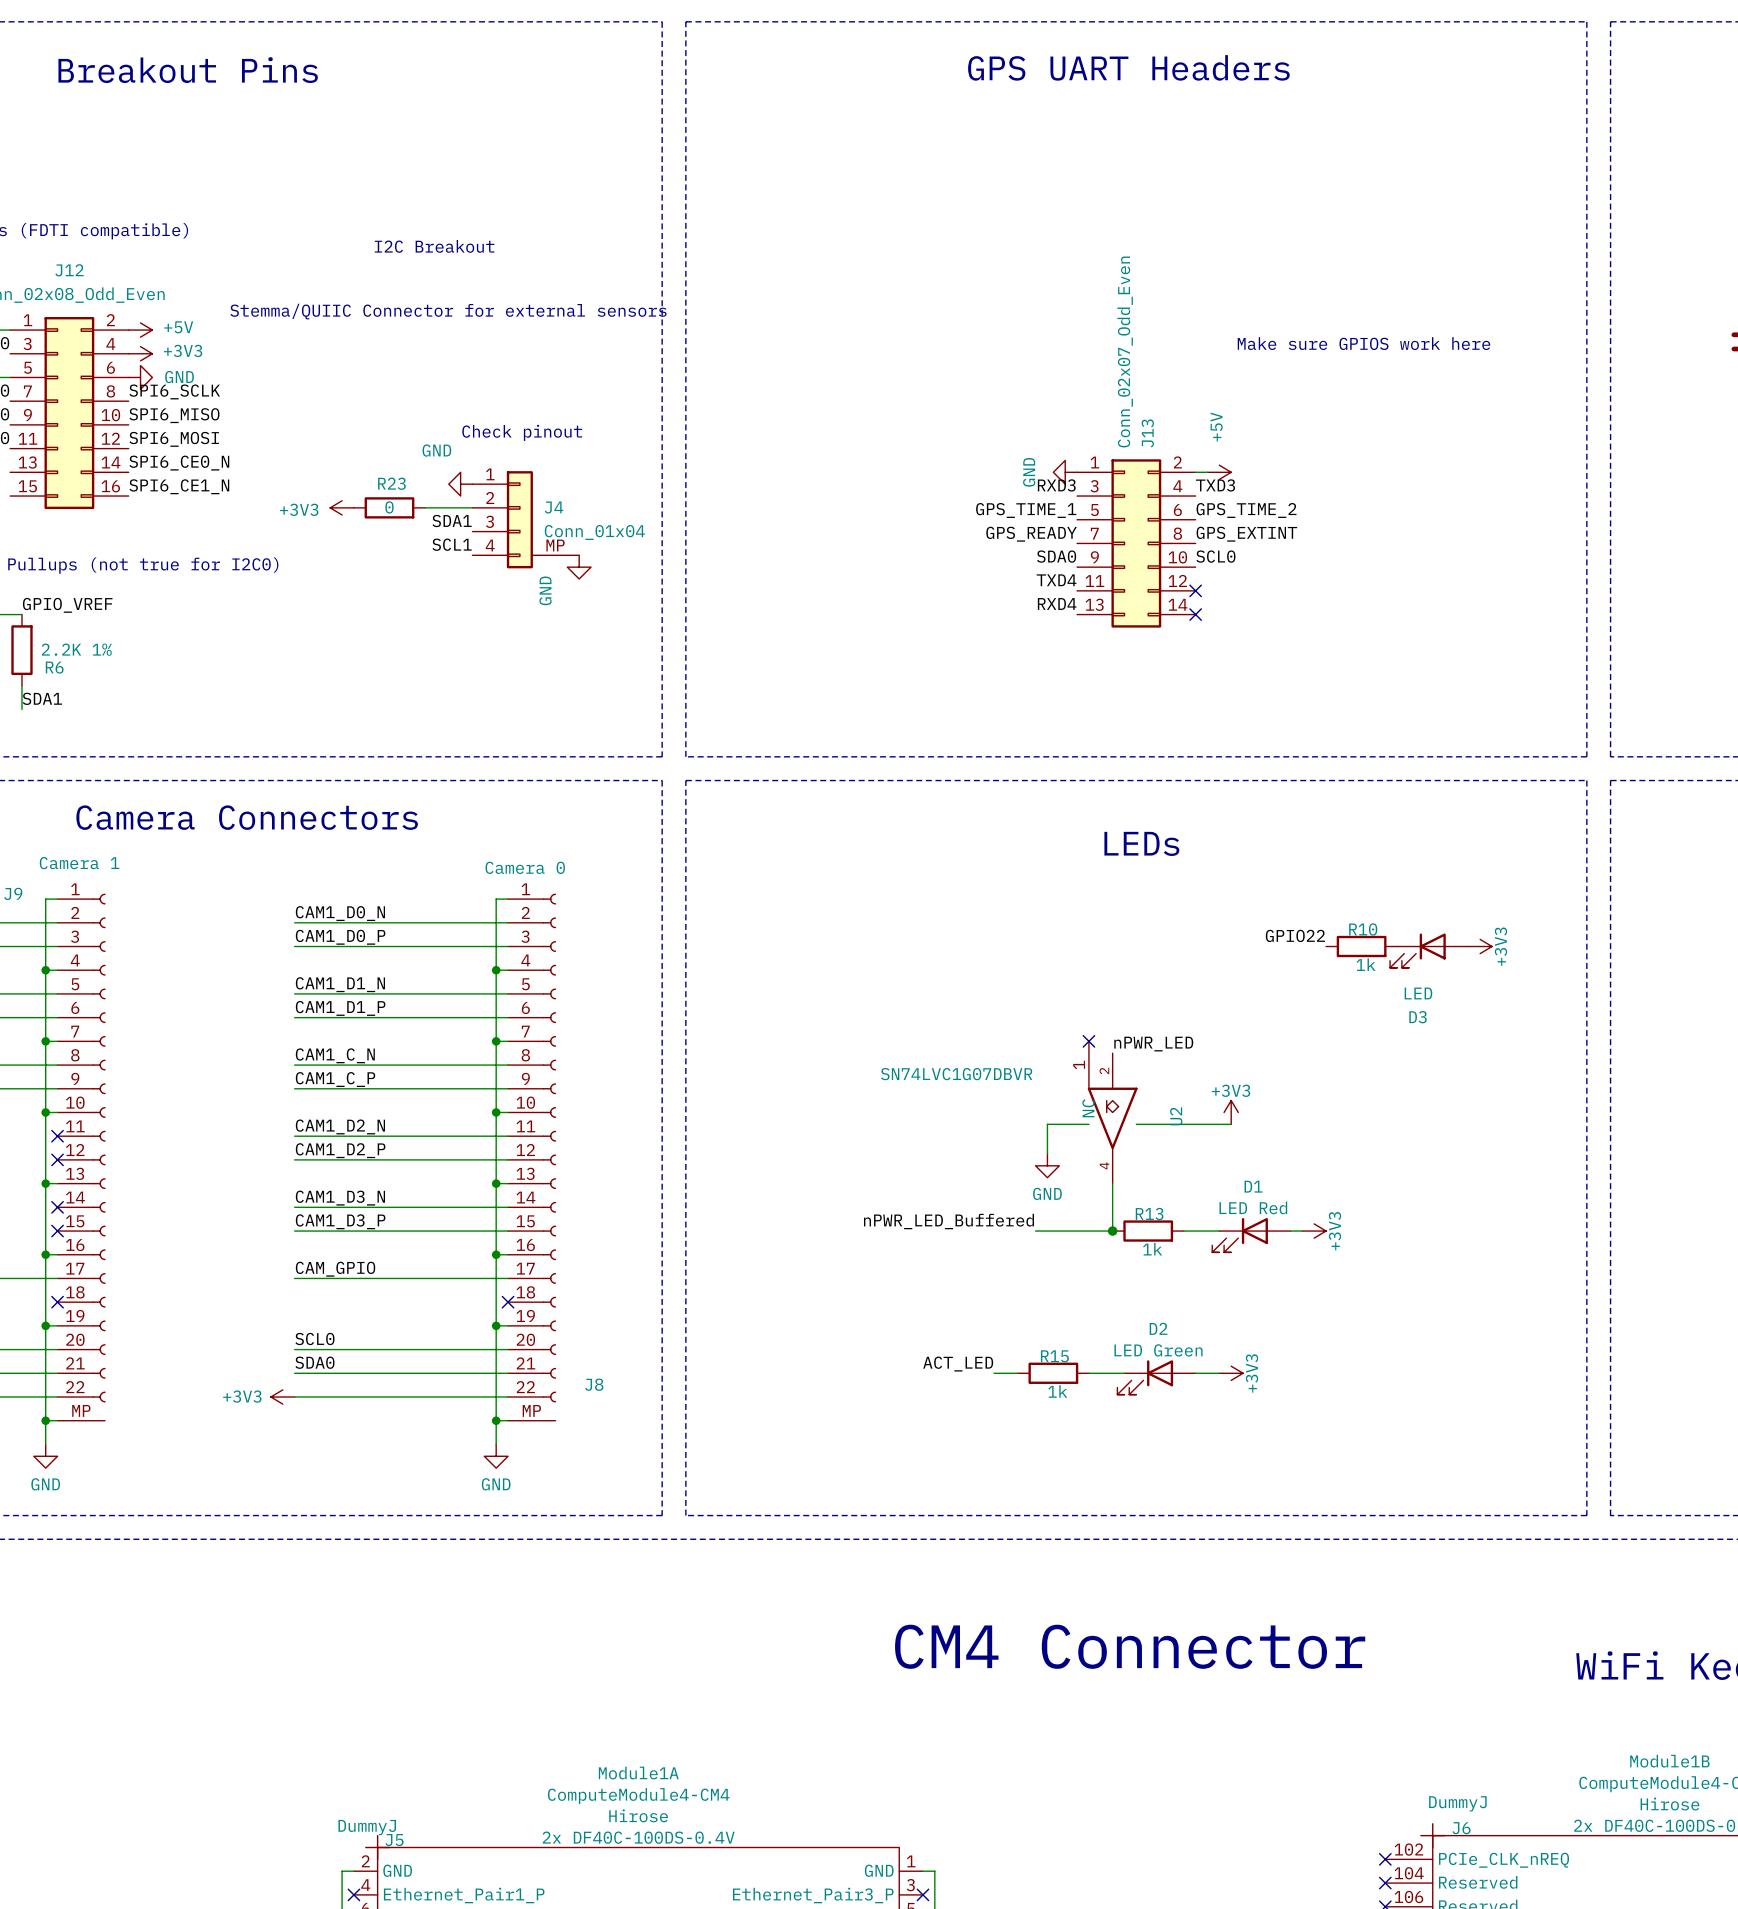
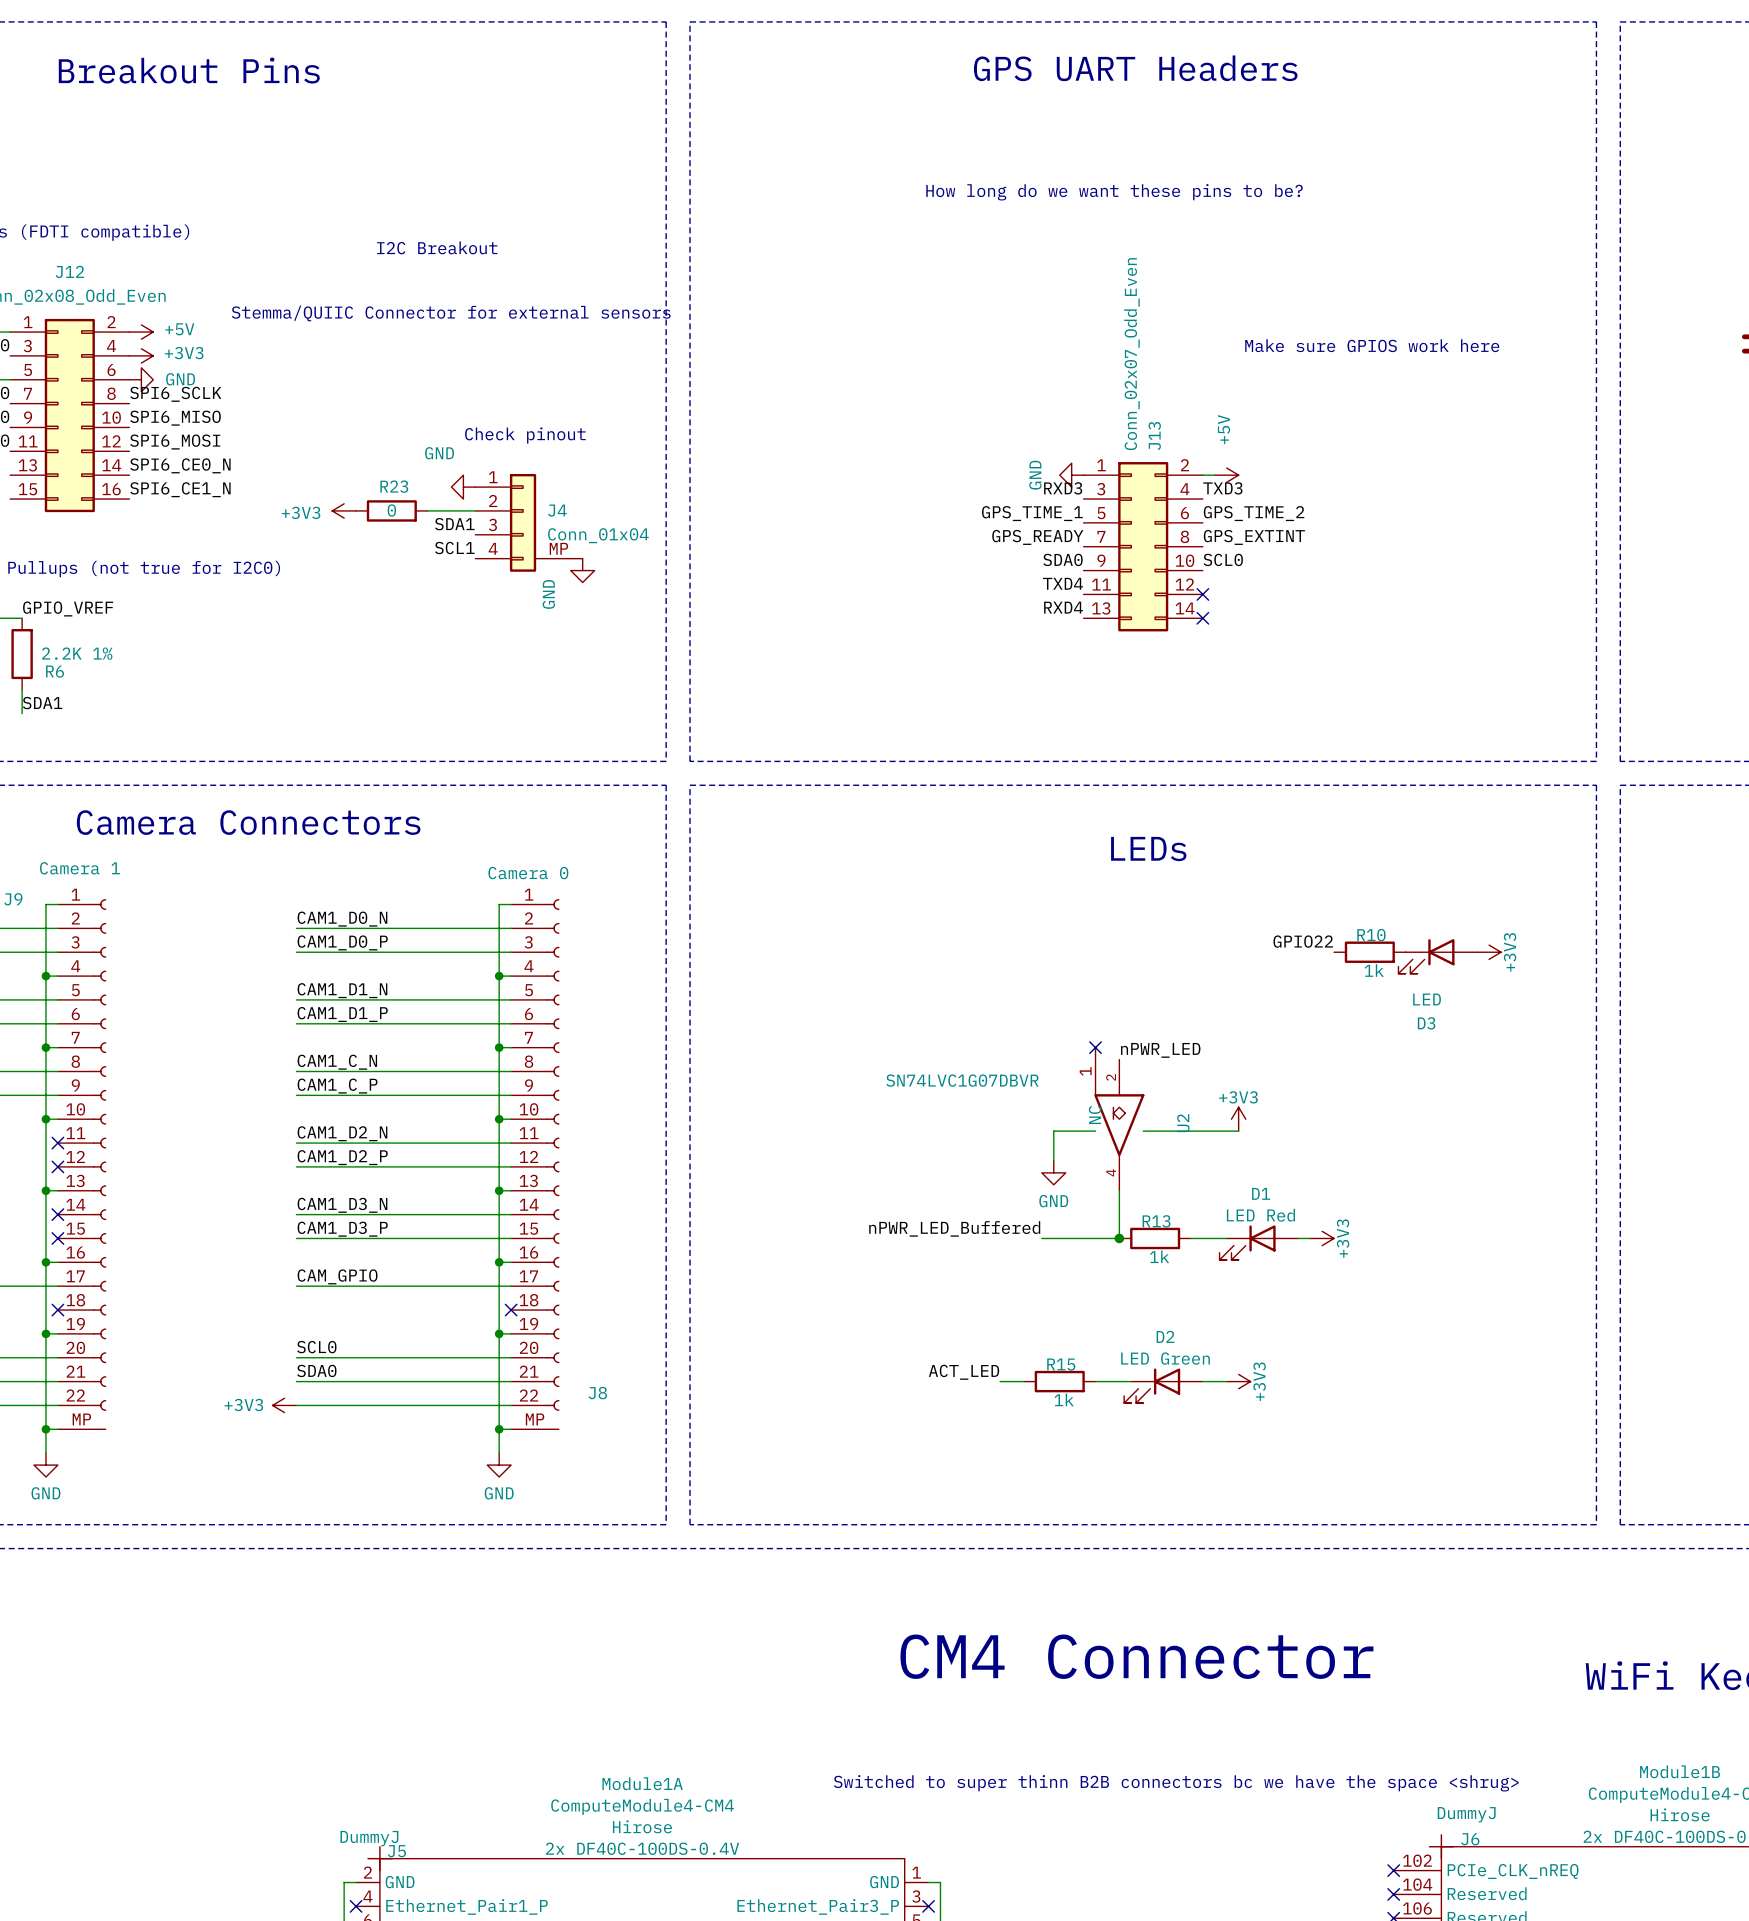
text: none -> How long do we want these pins to be? (1114, 192)
text: none -> Switched to super thinn B2B connectors bc we have the space <shrug> (1176, 1783)

